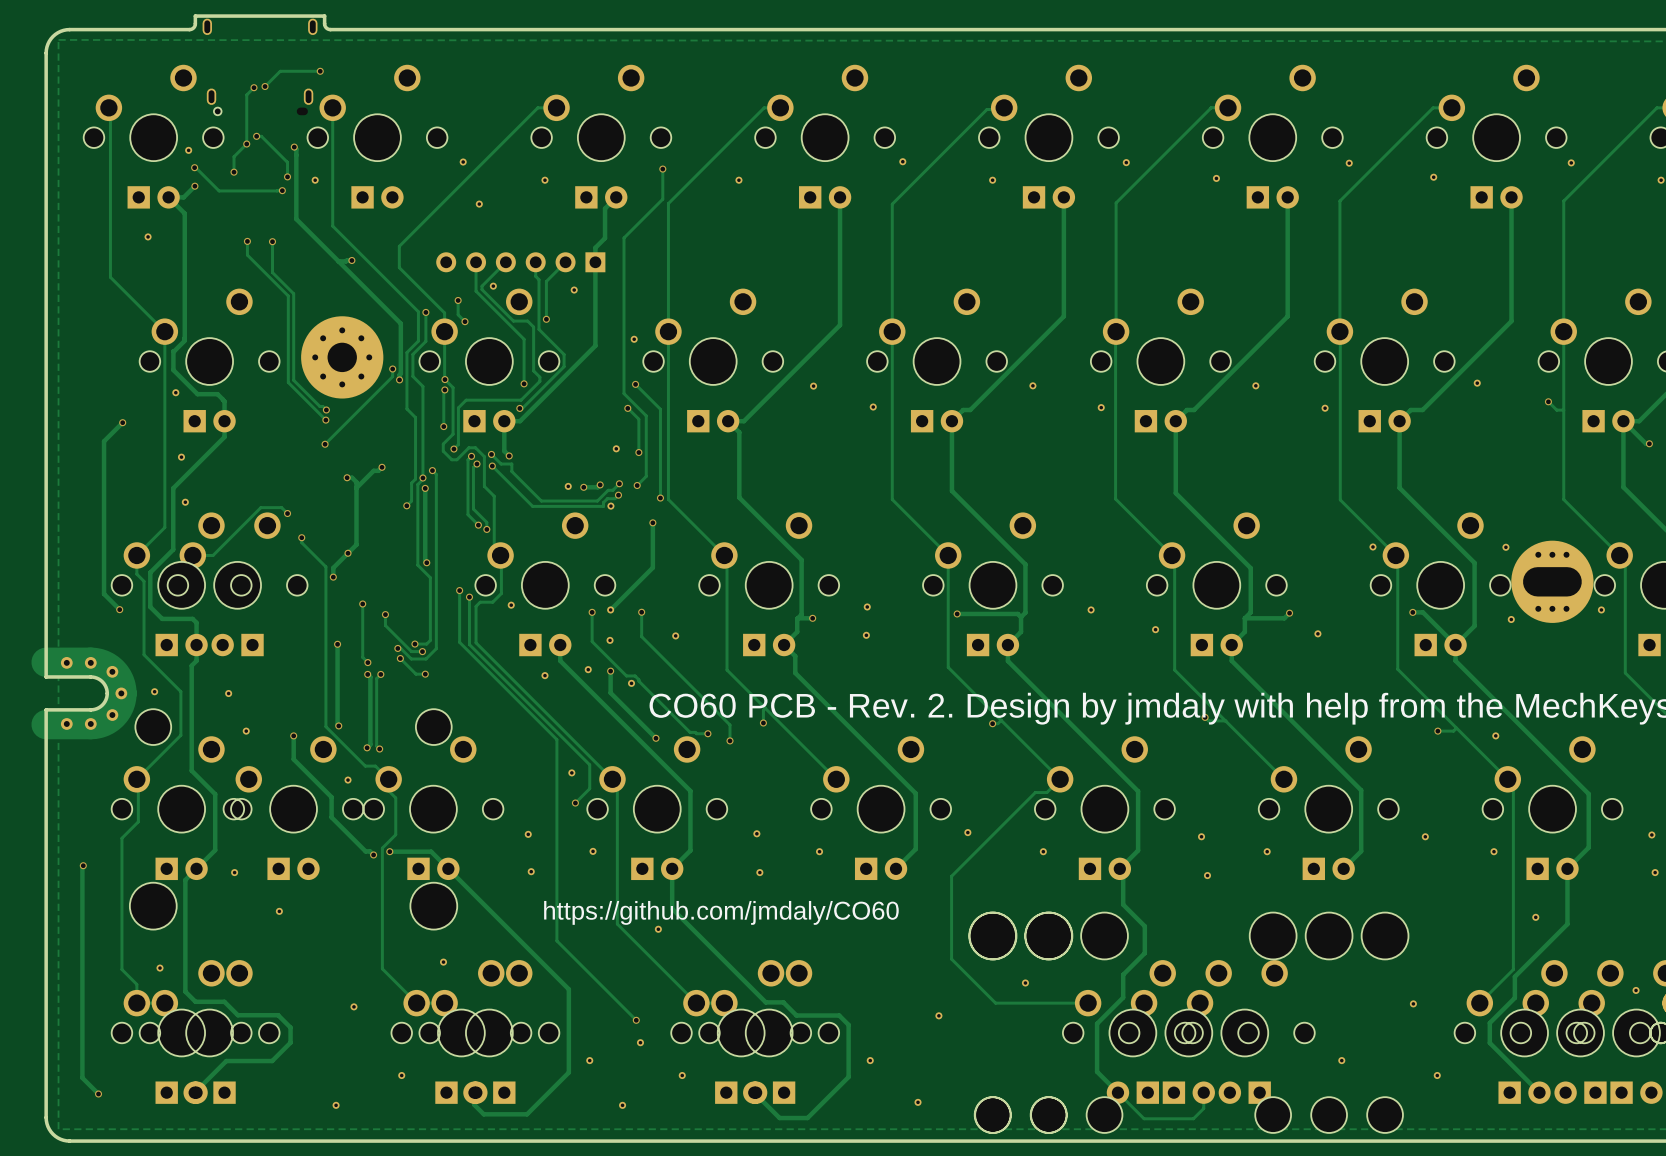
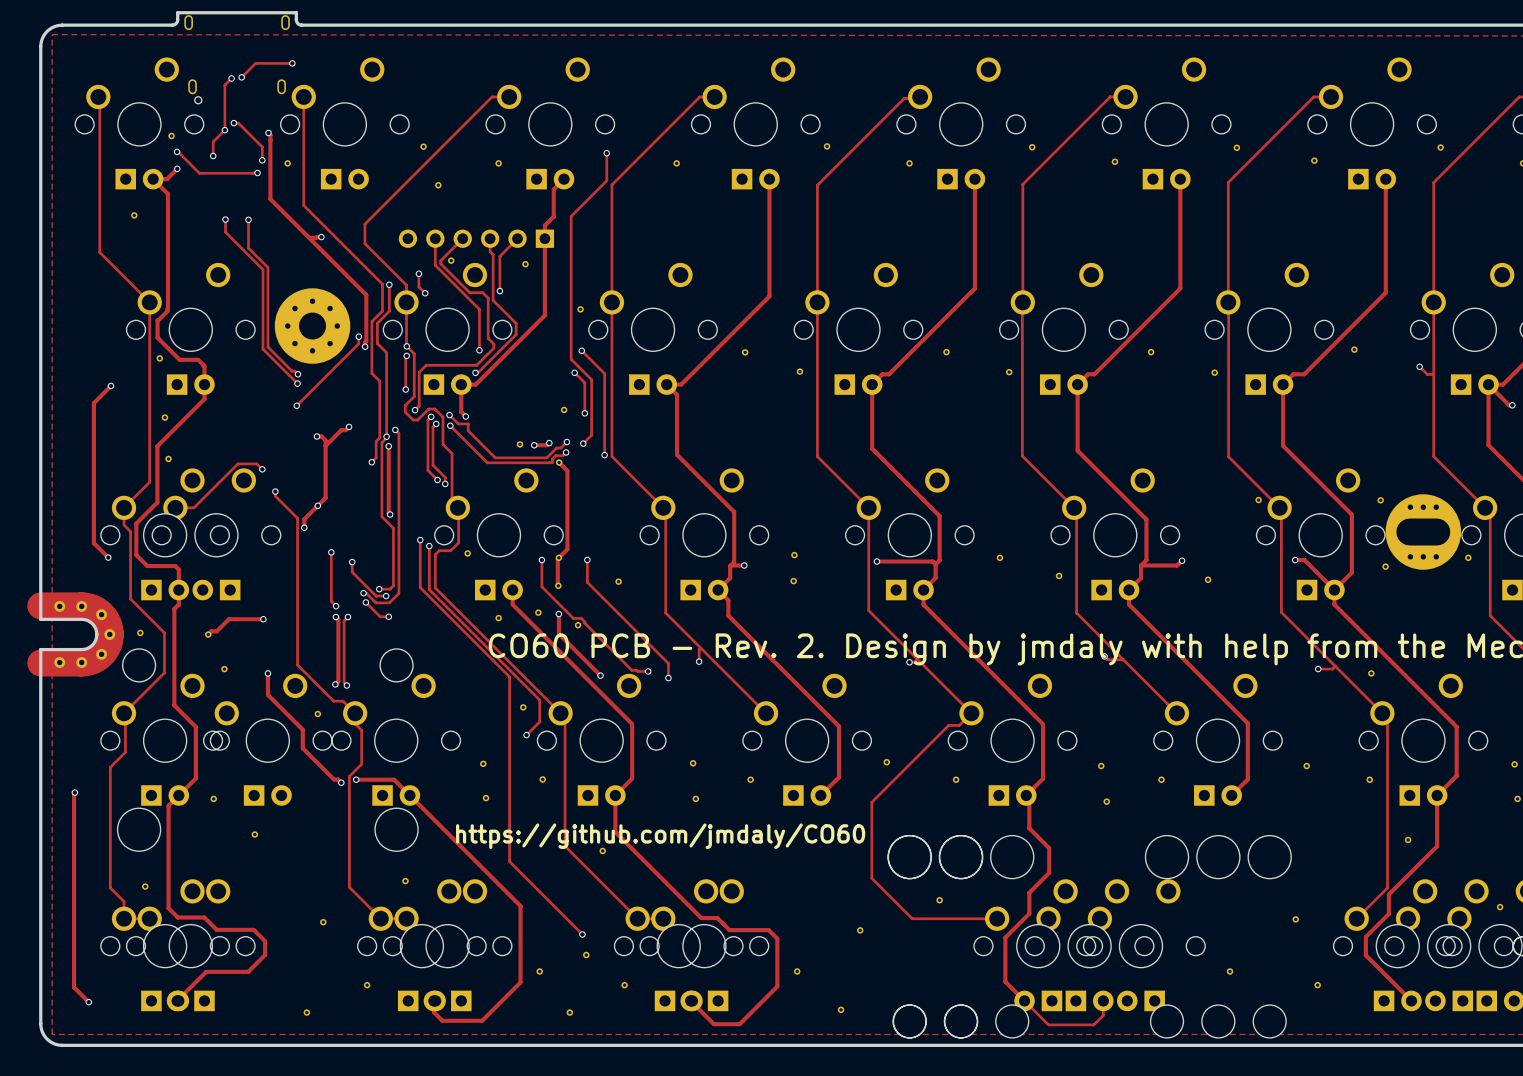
track: (652, 522) (652, 567) (619, 600) -> (559, 462) (567, 470) (567, 549)
via: (652, 522) -> none
track: none -> (558, 557) (557, 584)
track: (337, 644) (338, 725) -> none
via: (337, 644) -> none
track: none -> (263, 619) (228, 619) (216, 631) (211, 631) (208, 634)
via: none -> (263, 619)
via: (338, 725) -> none

